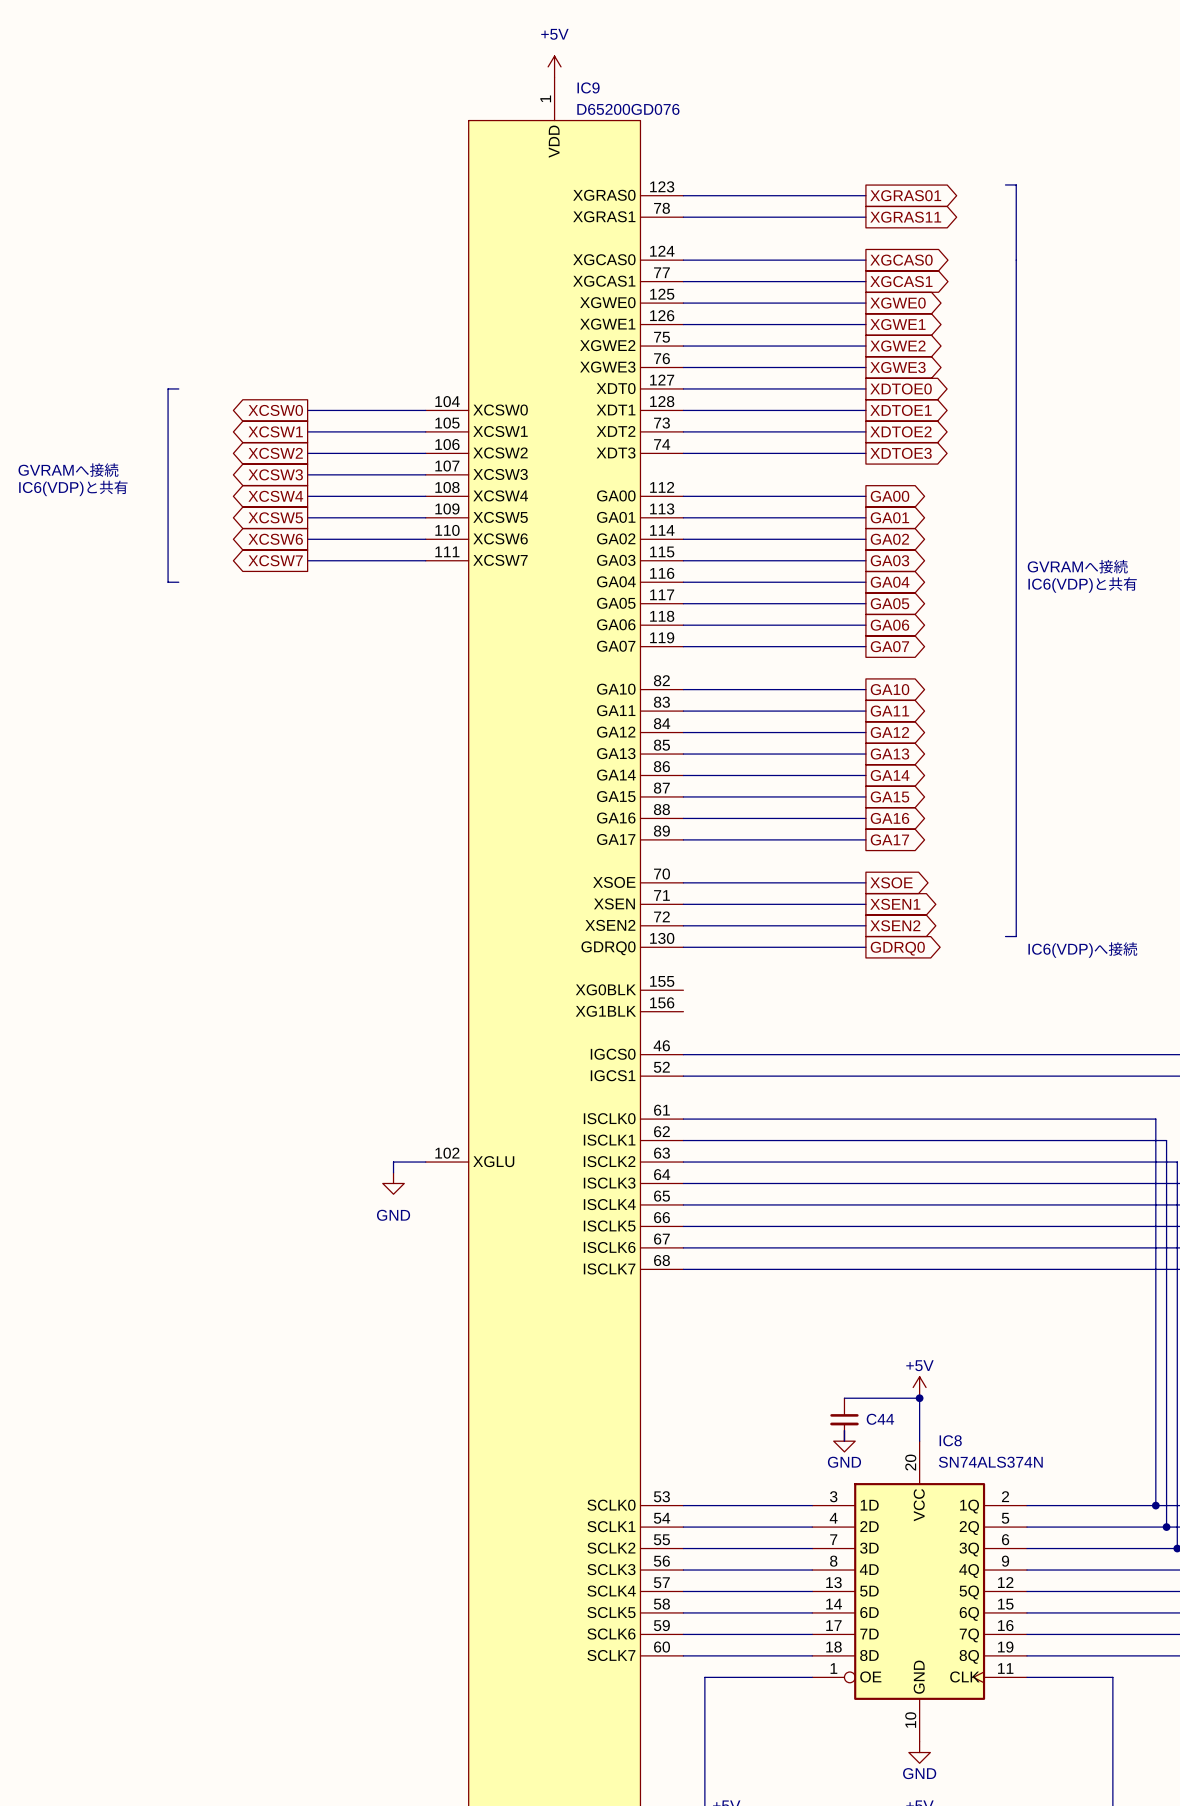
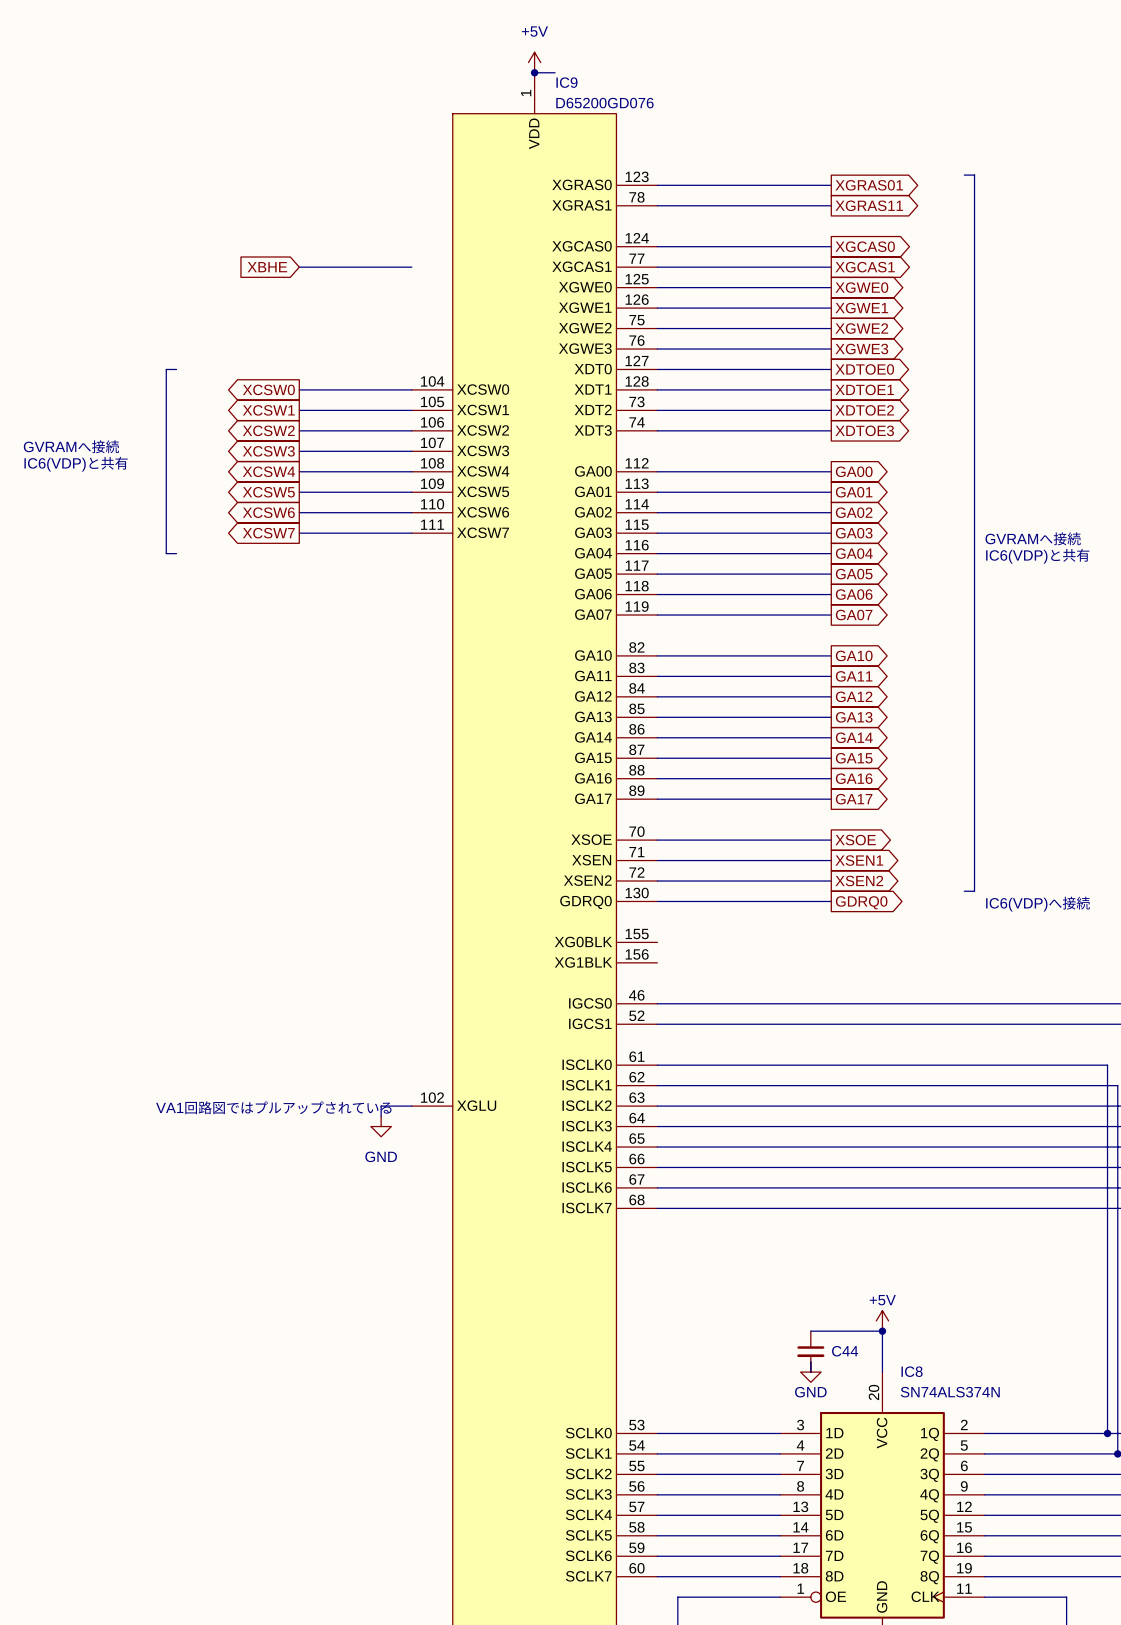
wire: none -> (534, 72) (555, 72)
junction: none -> (534, 72)
global label: none -> XBHE (267, 267)
wire: none -> (299, 267) (411, 267)
text: none -> VA1回路図ではプルアップされている (273, 1107)

